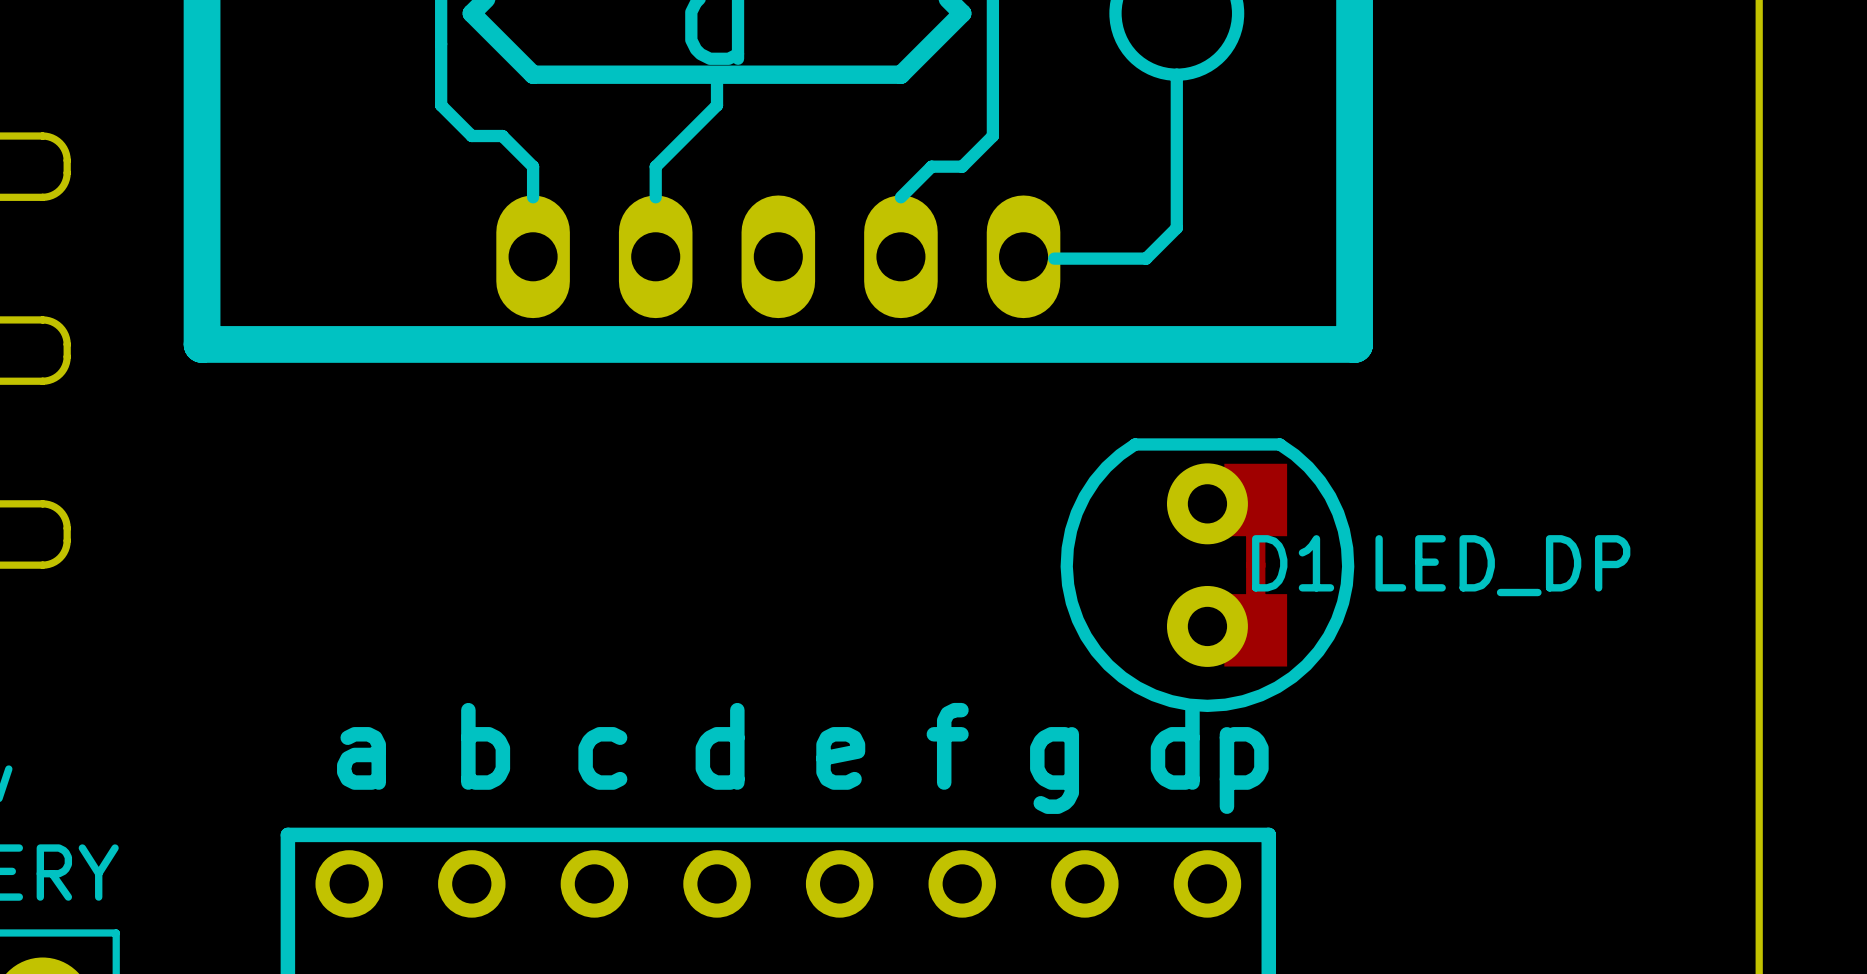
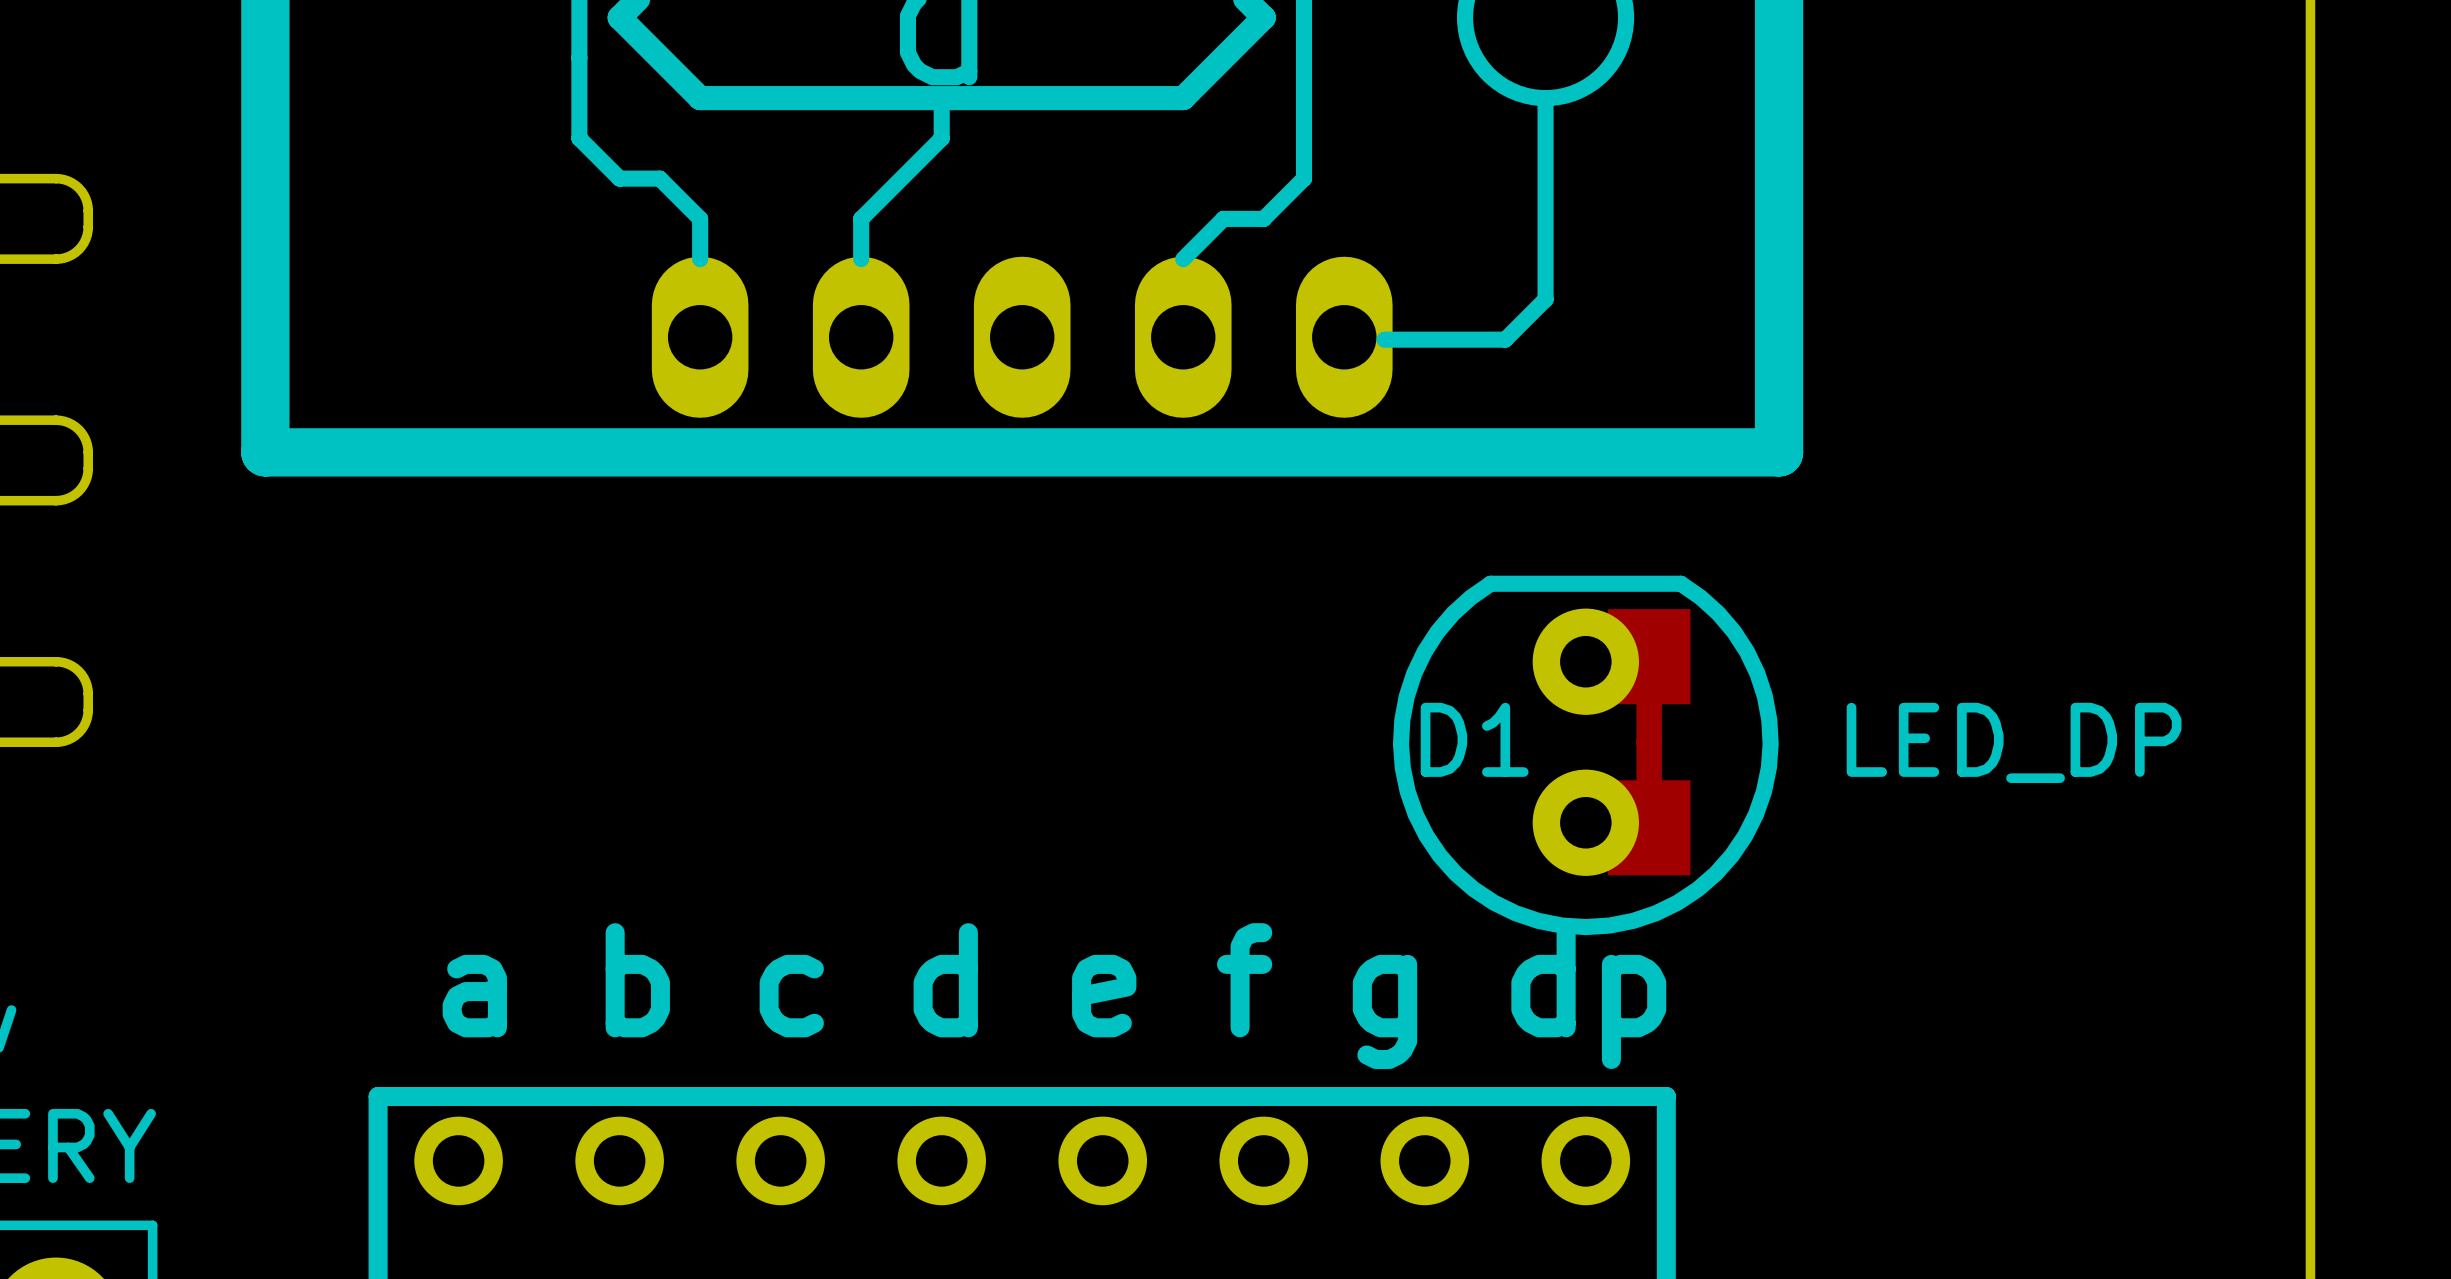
D1 name position: D1 (1293, 563) -> D1 (1474, 739)
D1 value position: LED_DP (1502, 565) -> LED_DP (2014, 742)

